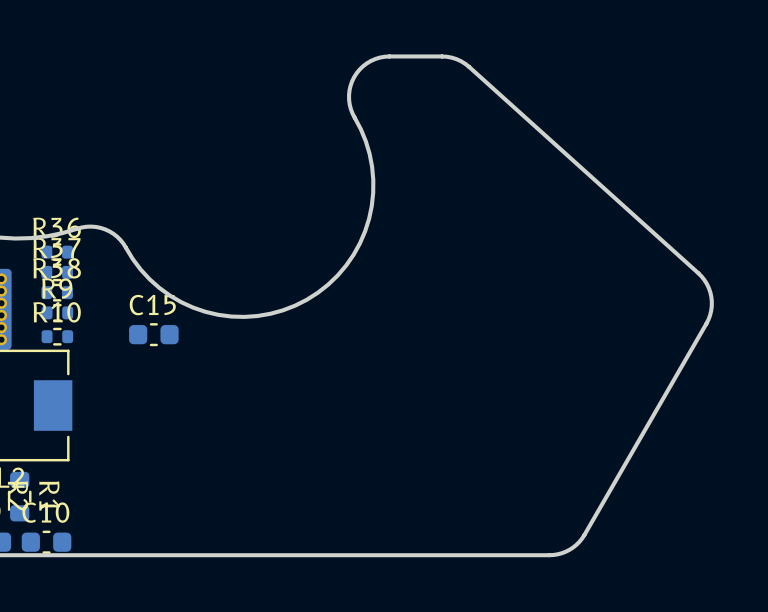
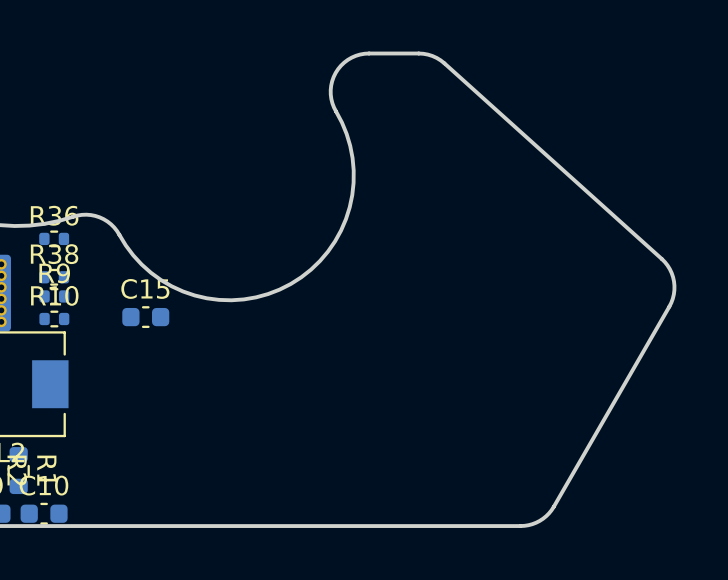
R37: (57, 272) -> none

